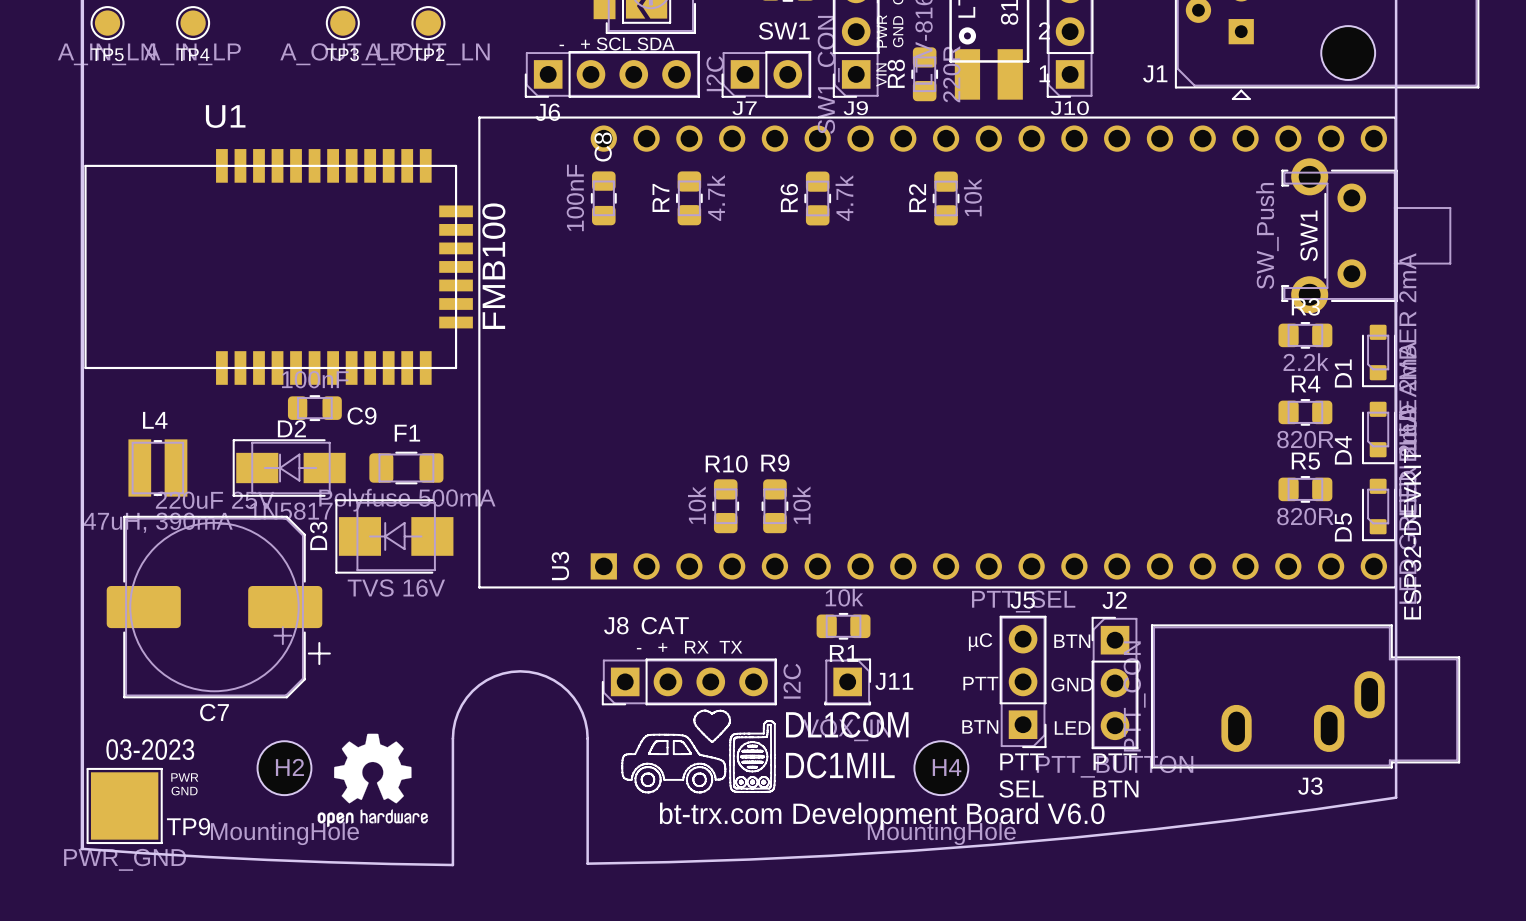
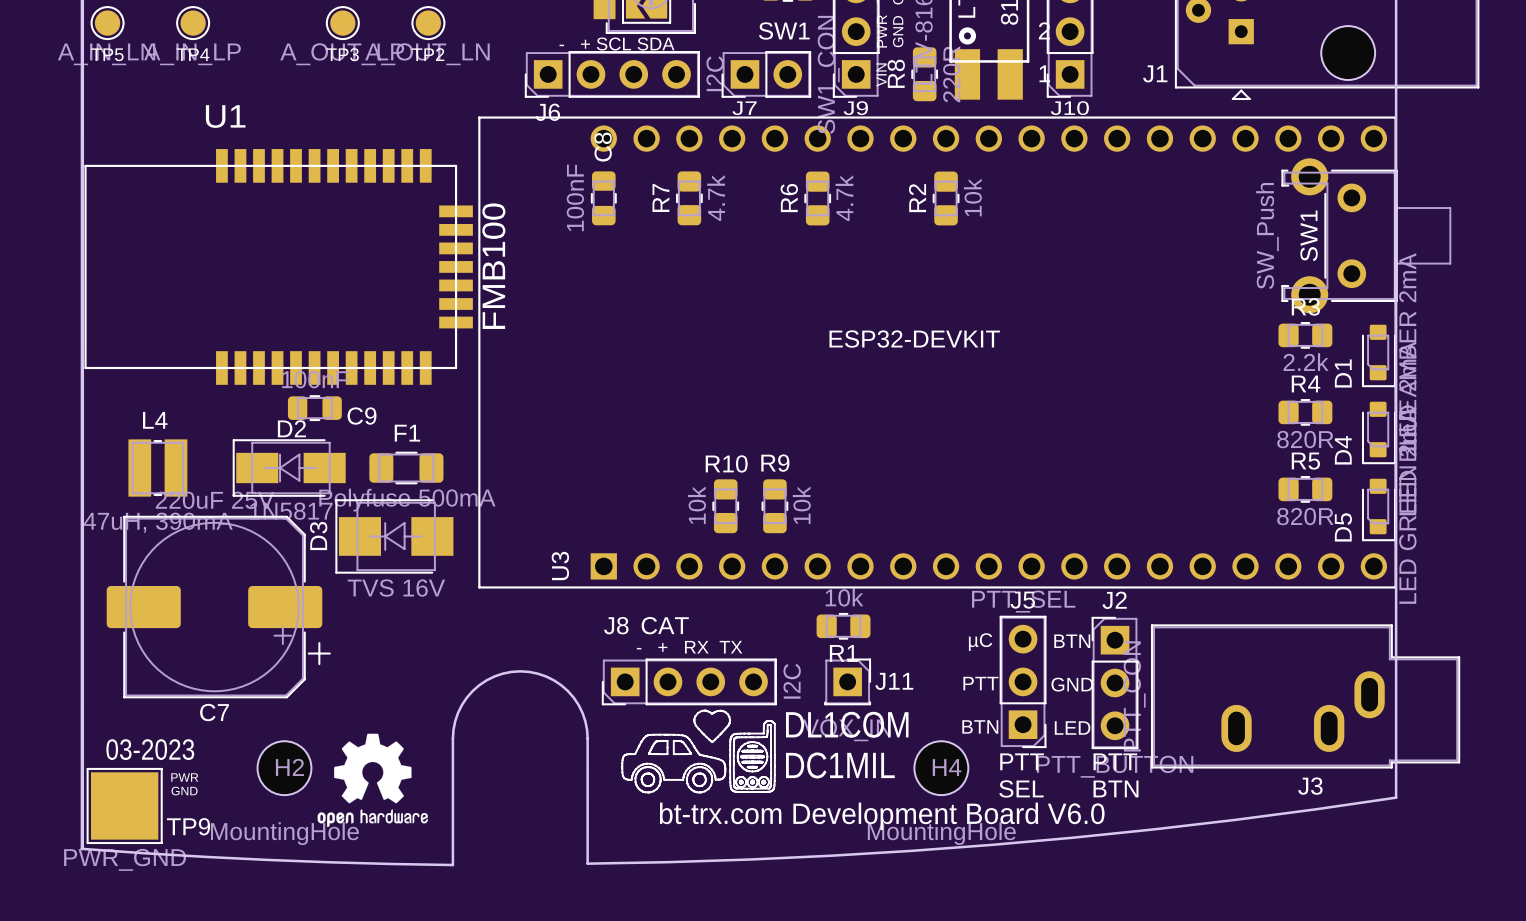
U3 value rotation: 0° (1412, 534) -> 90° clockwise (914, 339)
U3 value position: ESP32-DEVKIT (1412, 534) -> ESP32-DEVKIT (914, 339)

